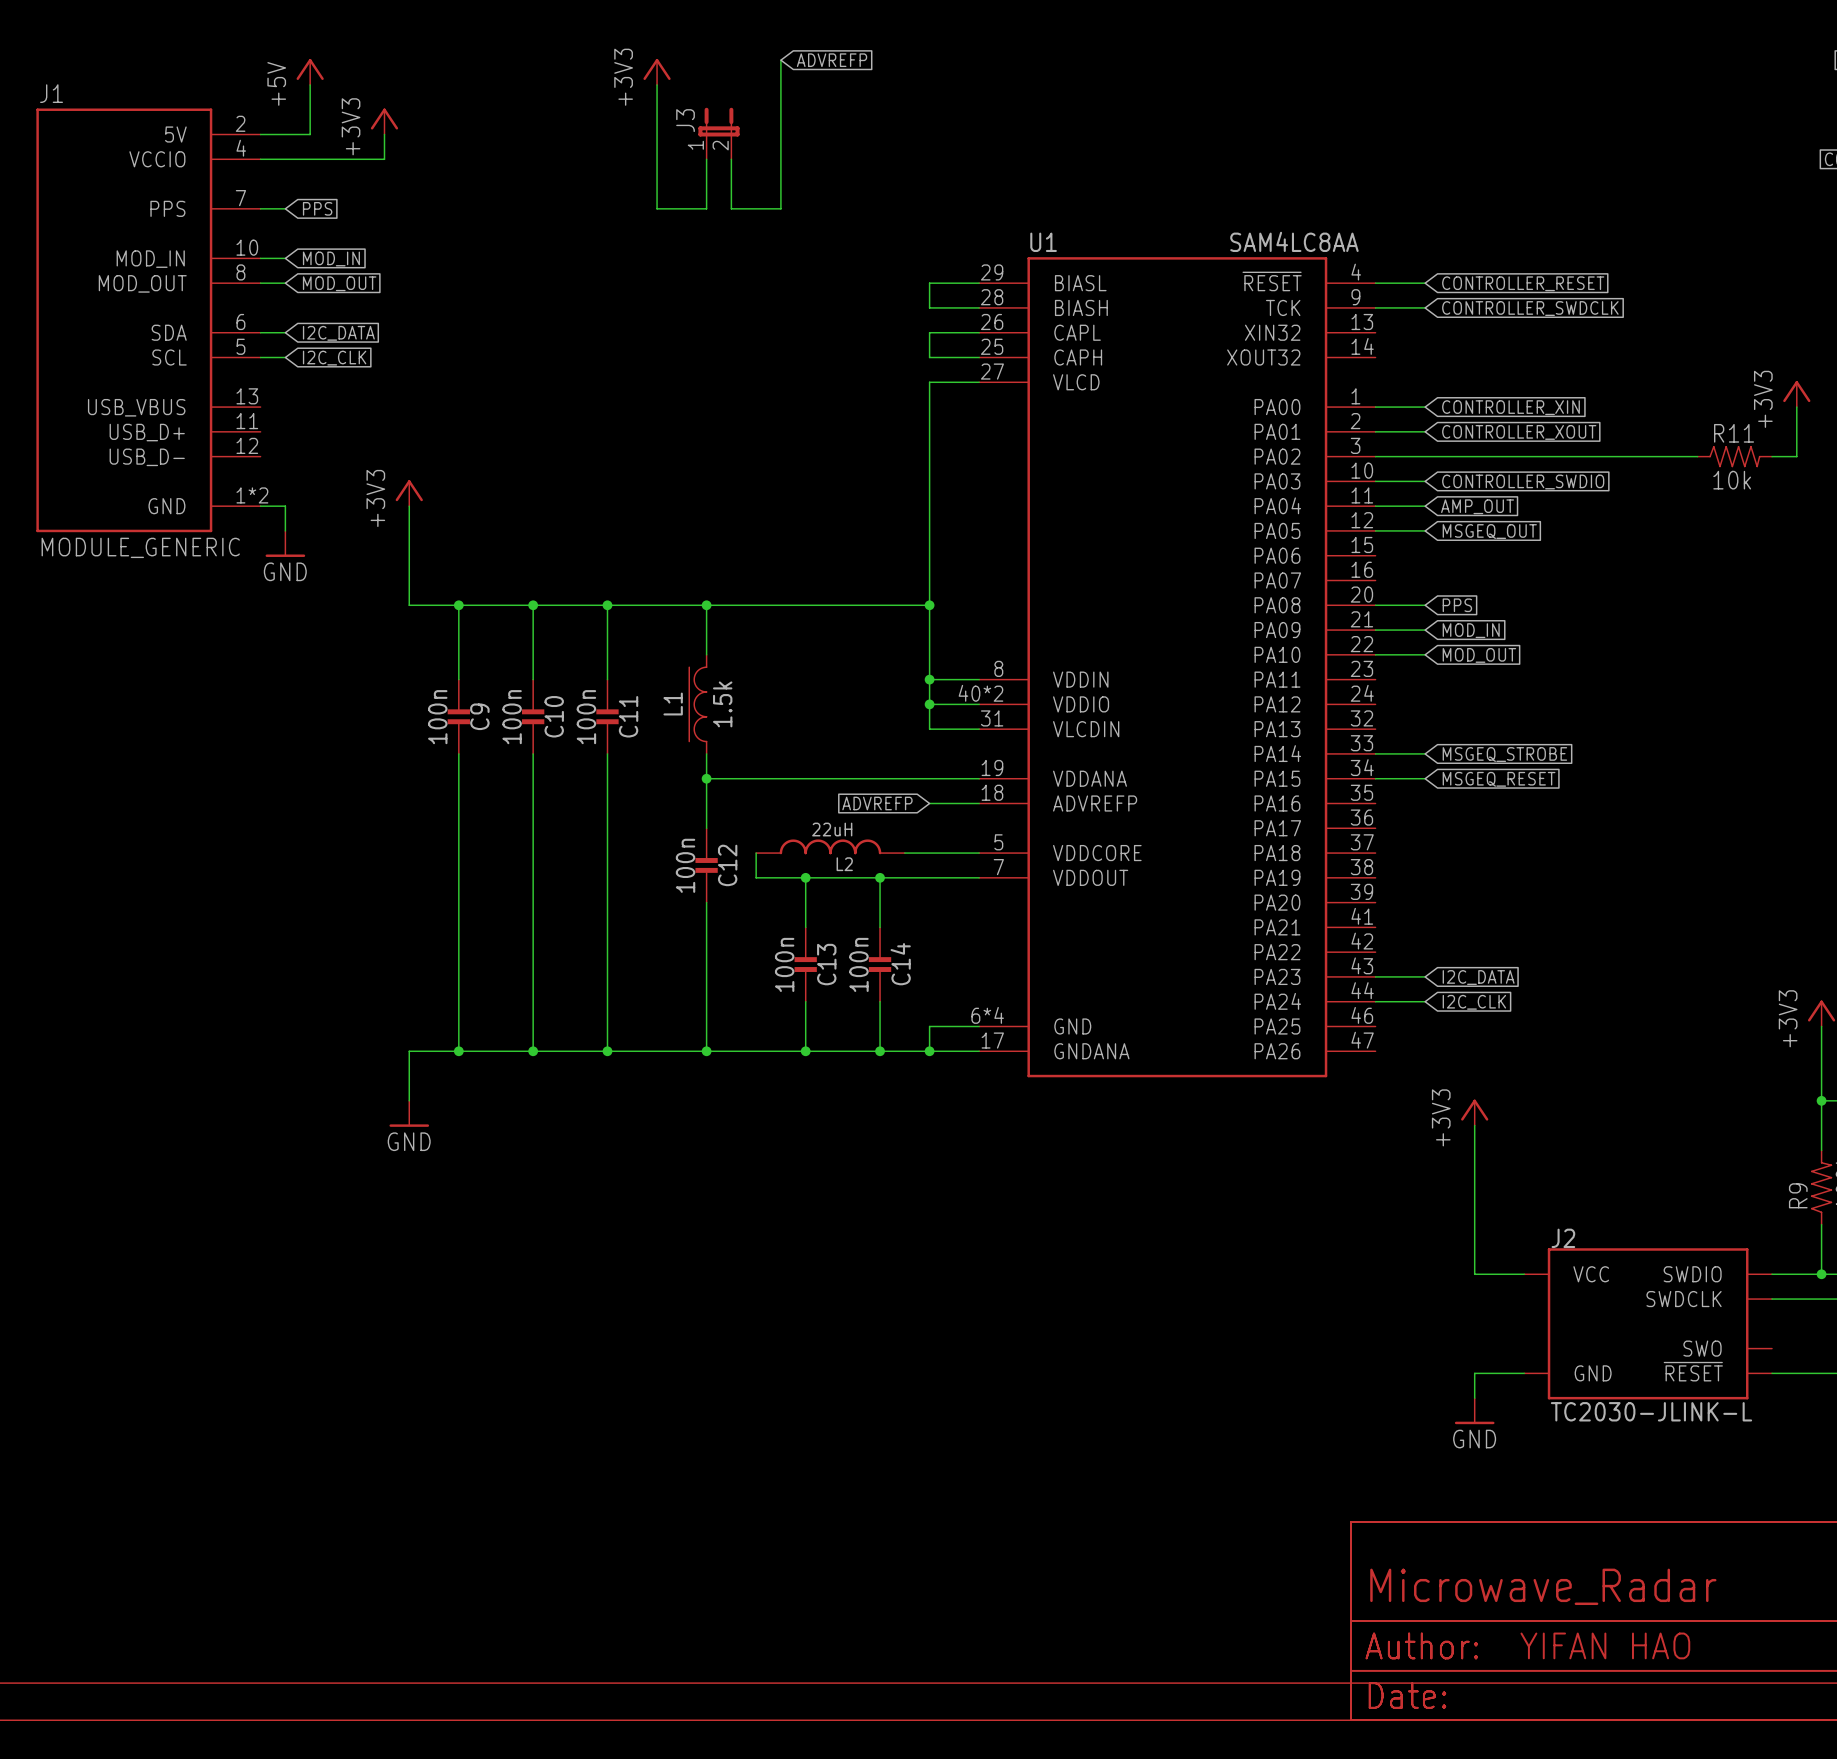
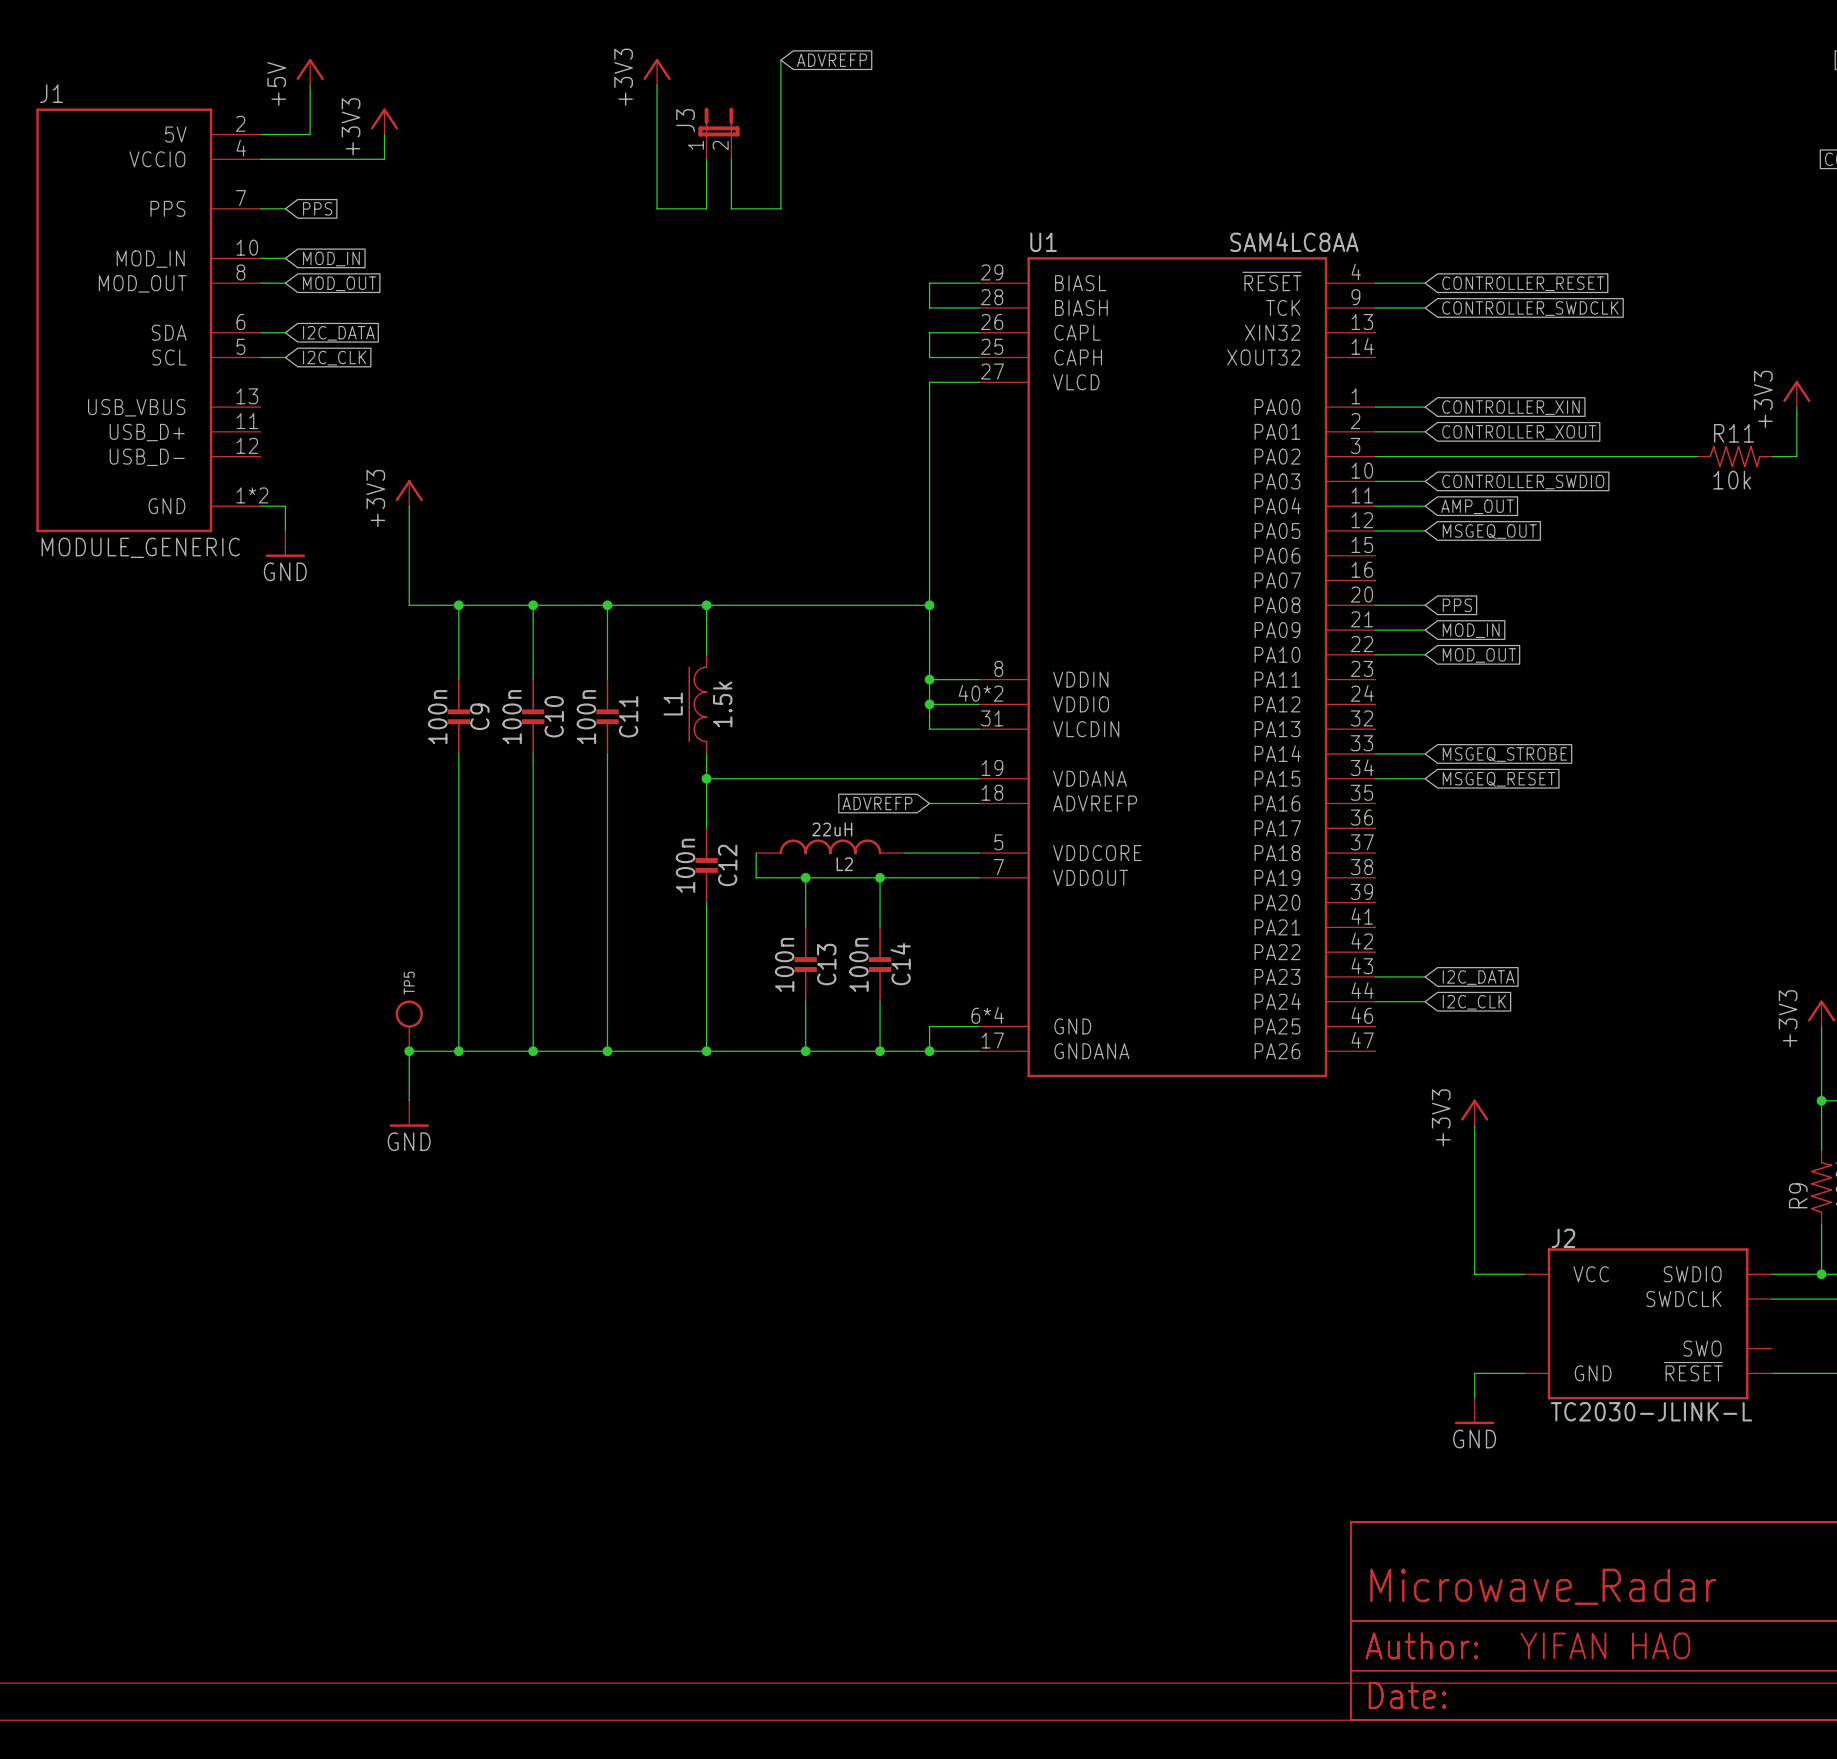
TP5: none -> (409, 1025)
junction: none -> (409, 1051)

